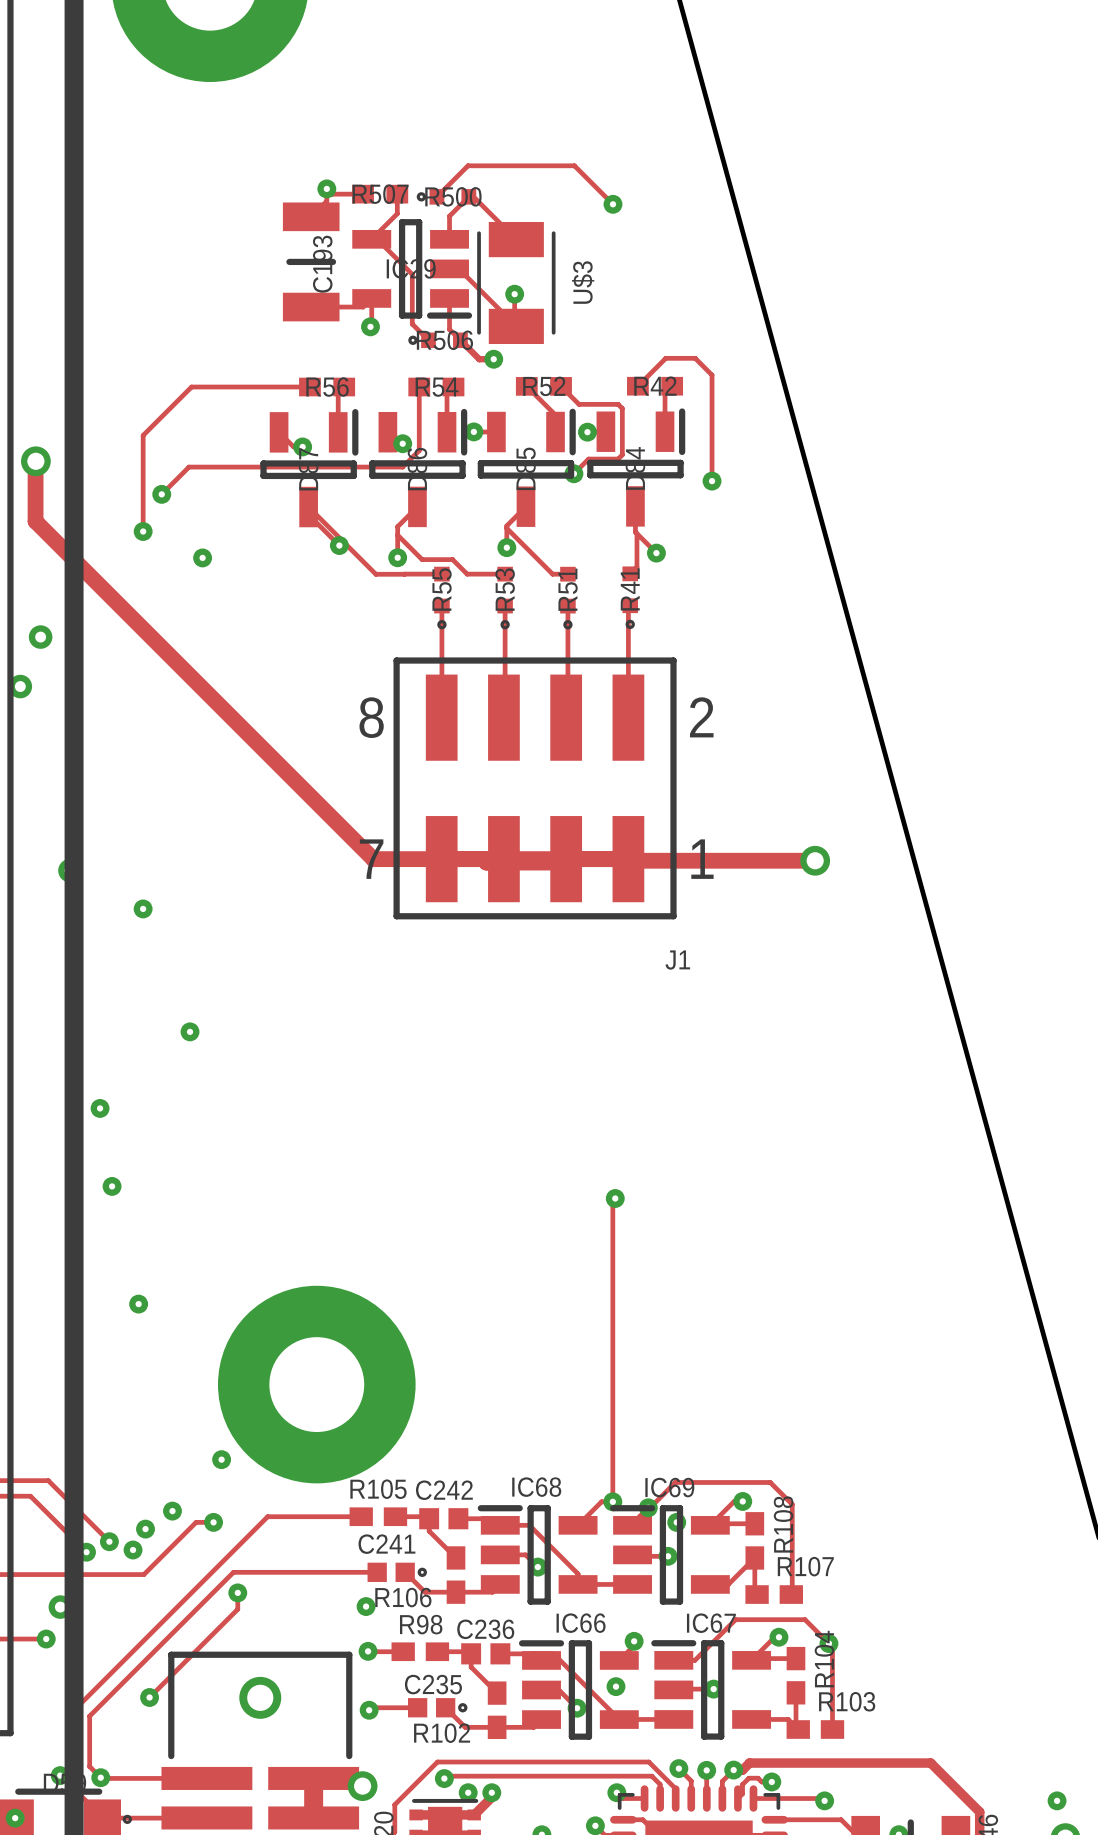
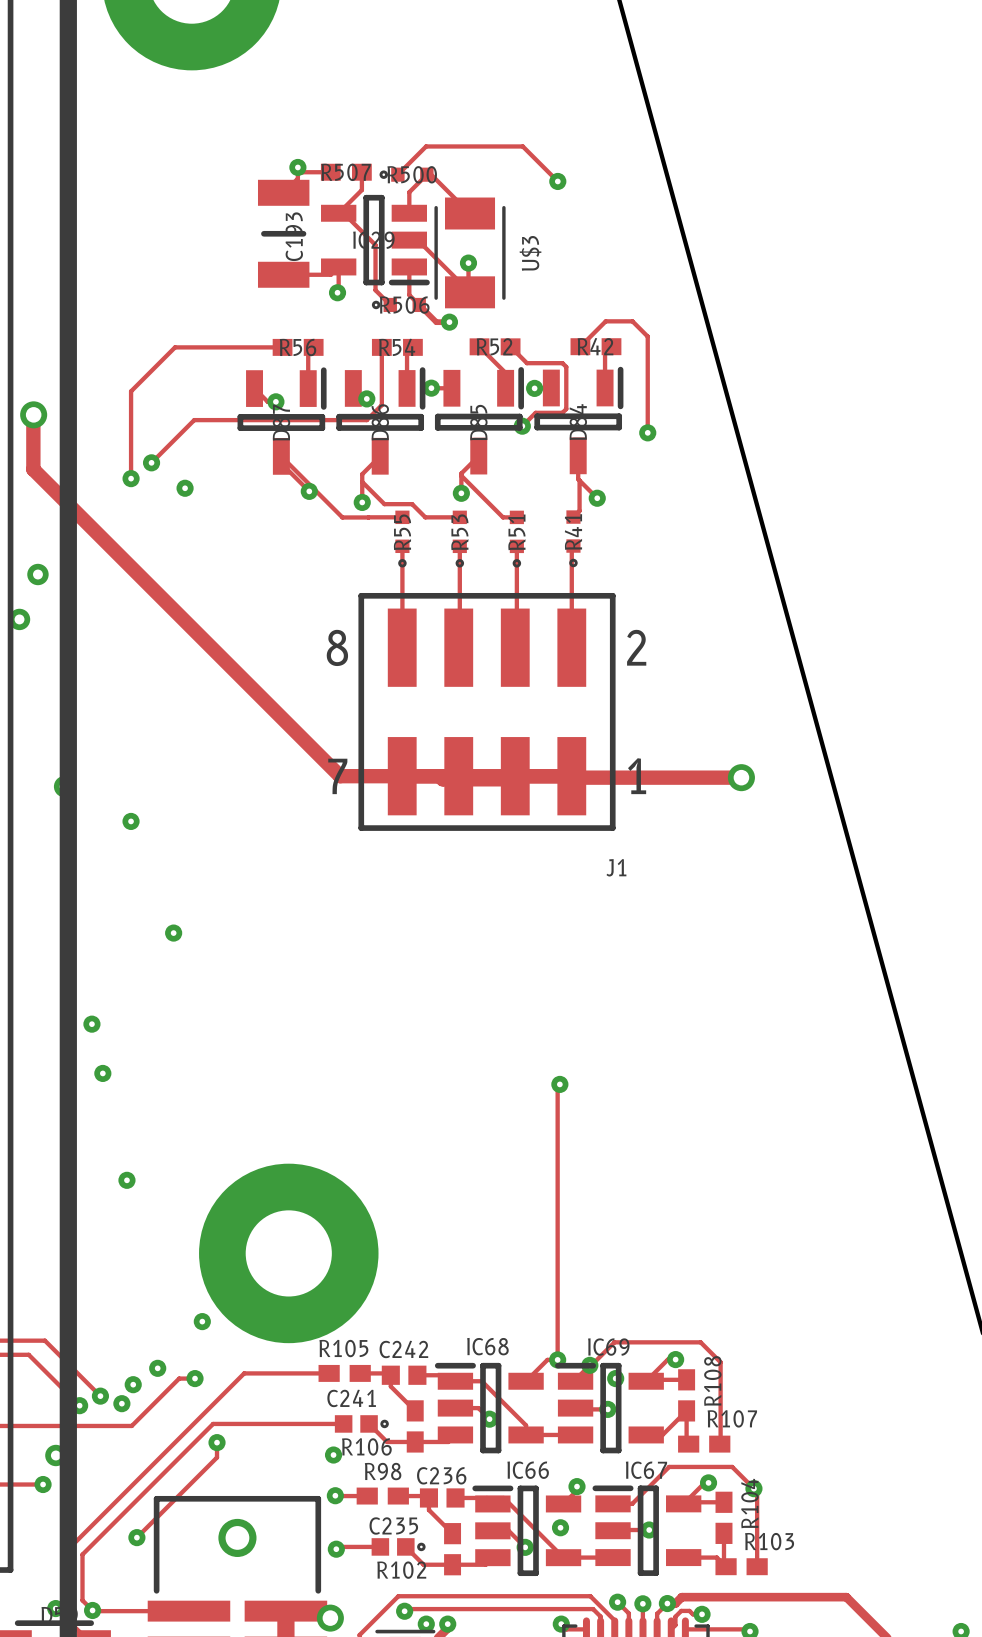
track: (212, 467) (189, 467) (161, 494) -> (194, 420) (151, 462)
via position: (161, 494) -> (151, 462)
via position: (202, 557) -> (185, 488)
via position: (100, 1108) -> (91, 1024)

